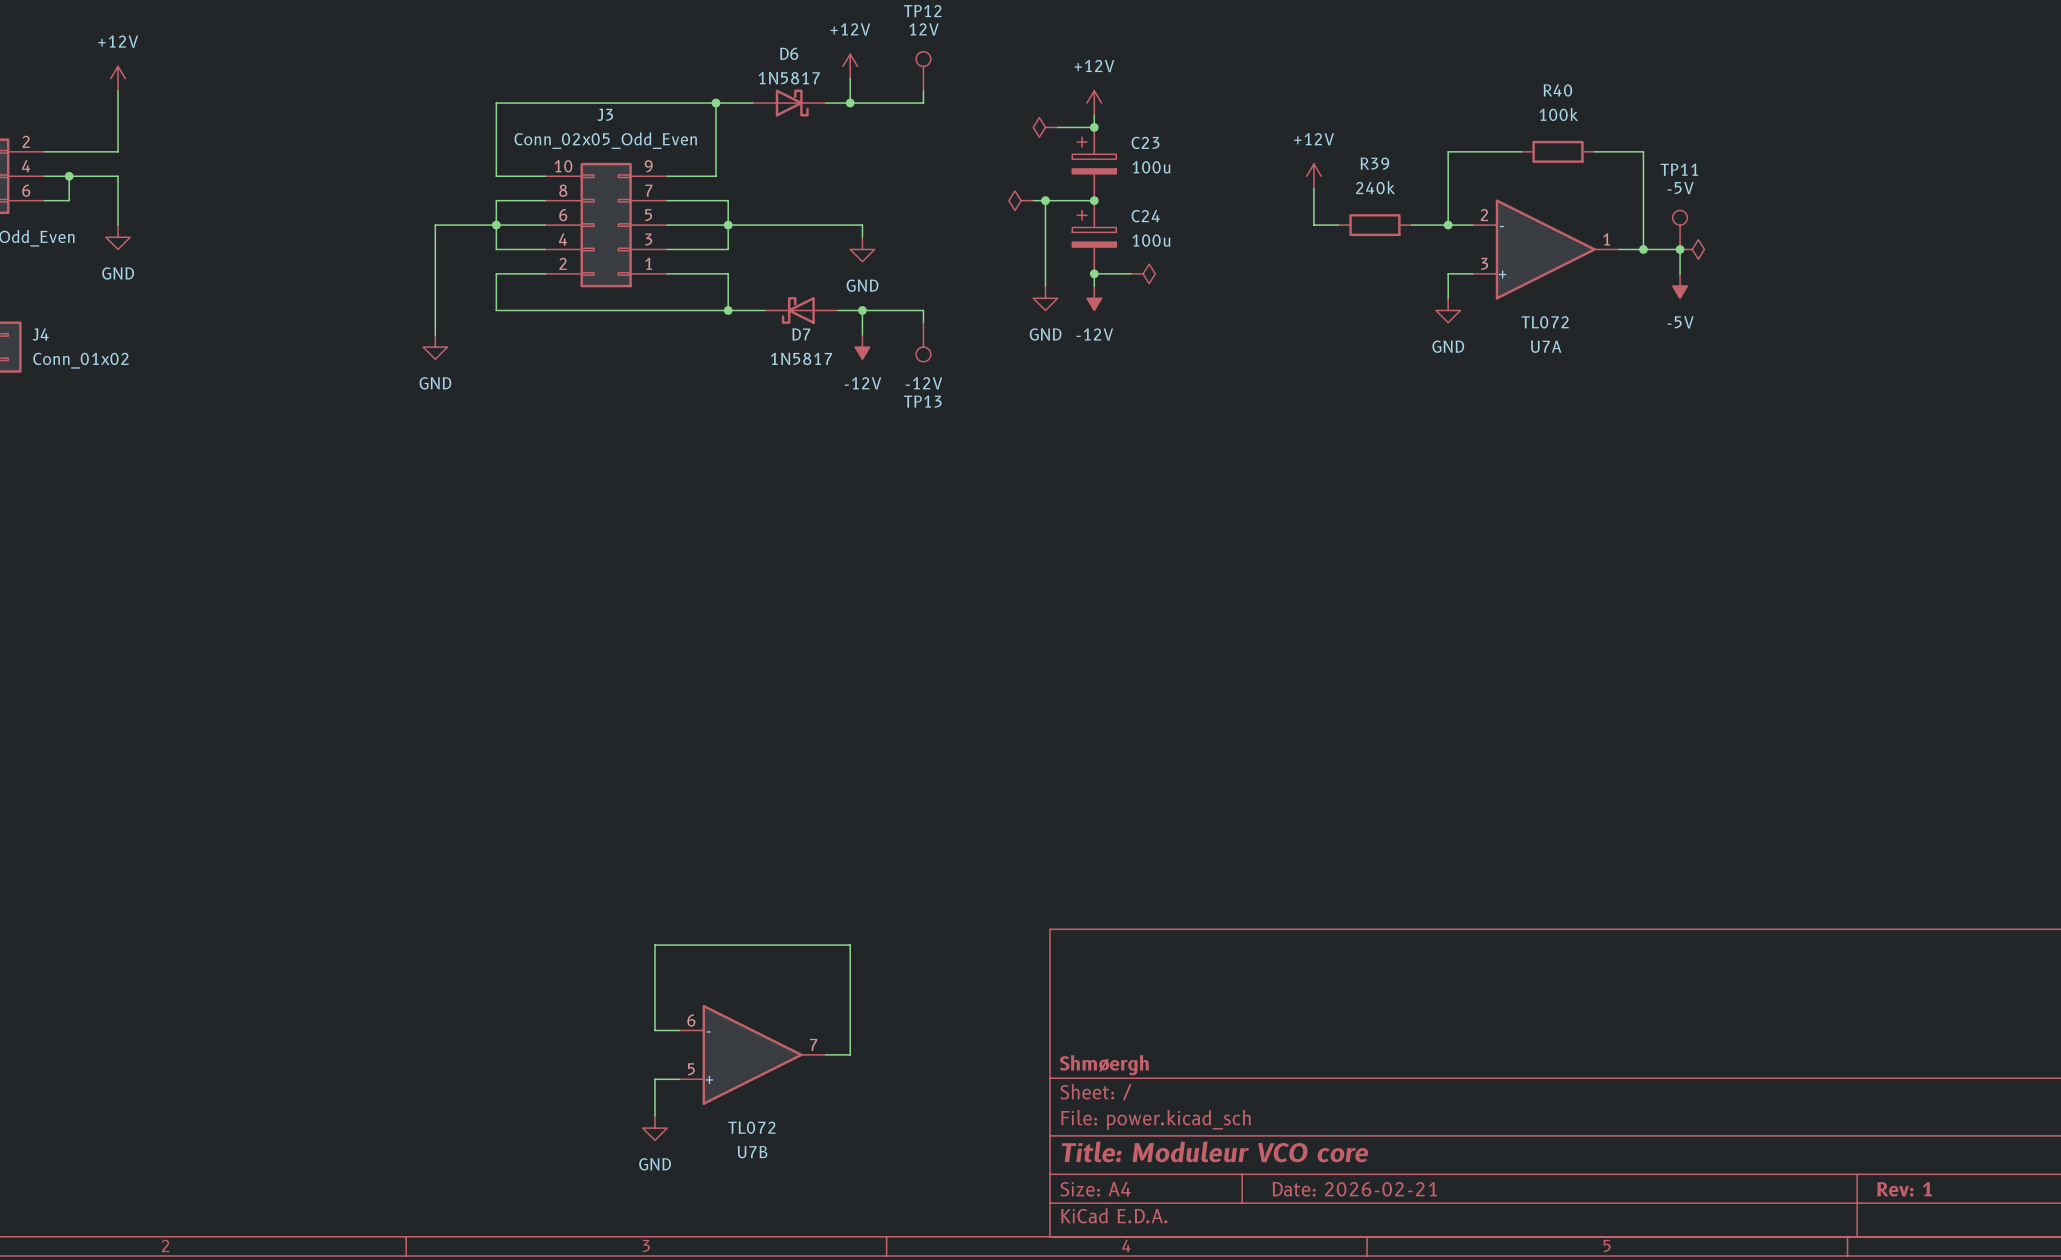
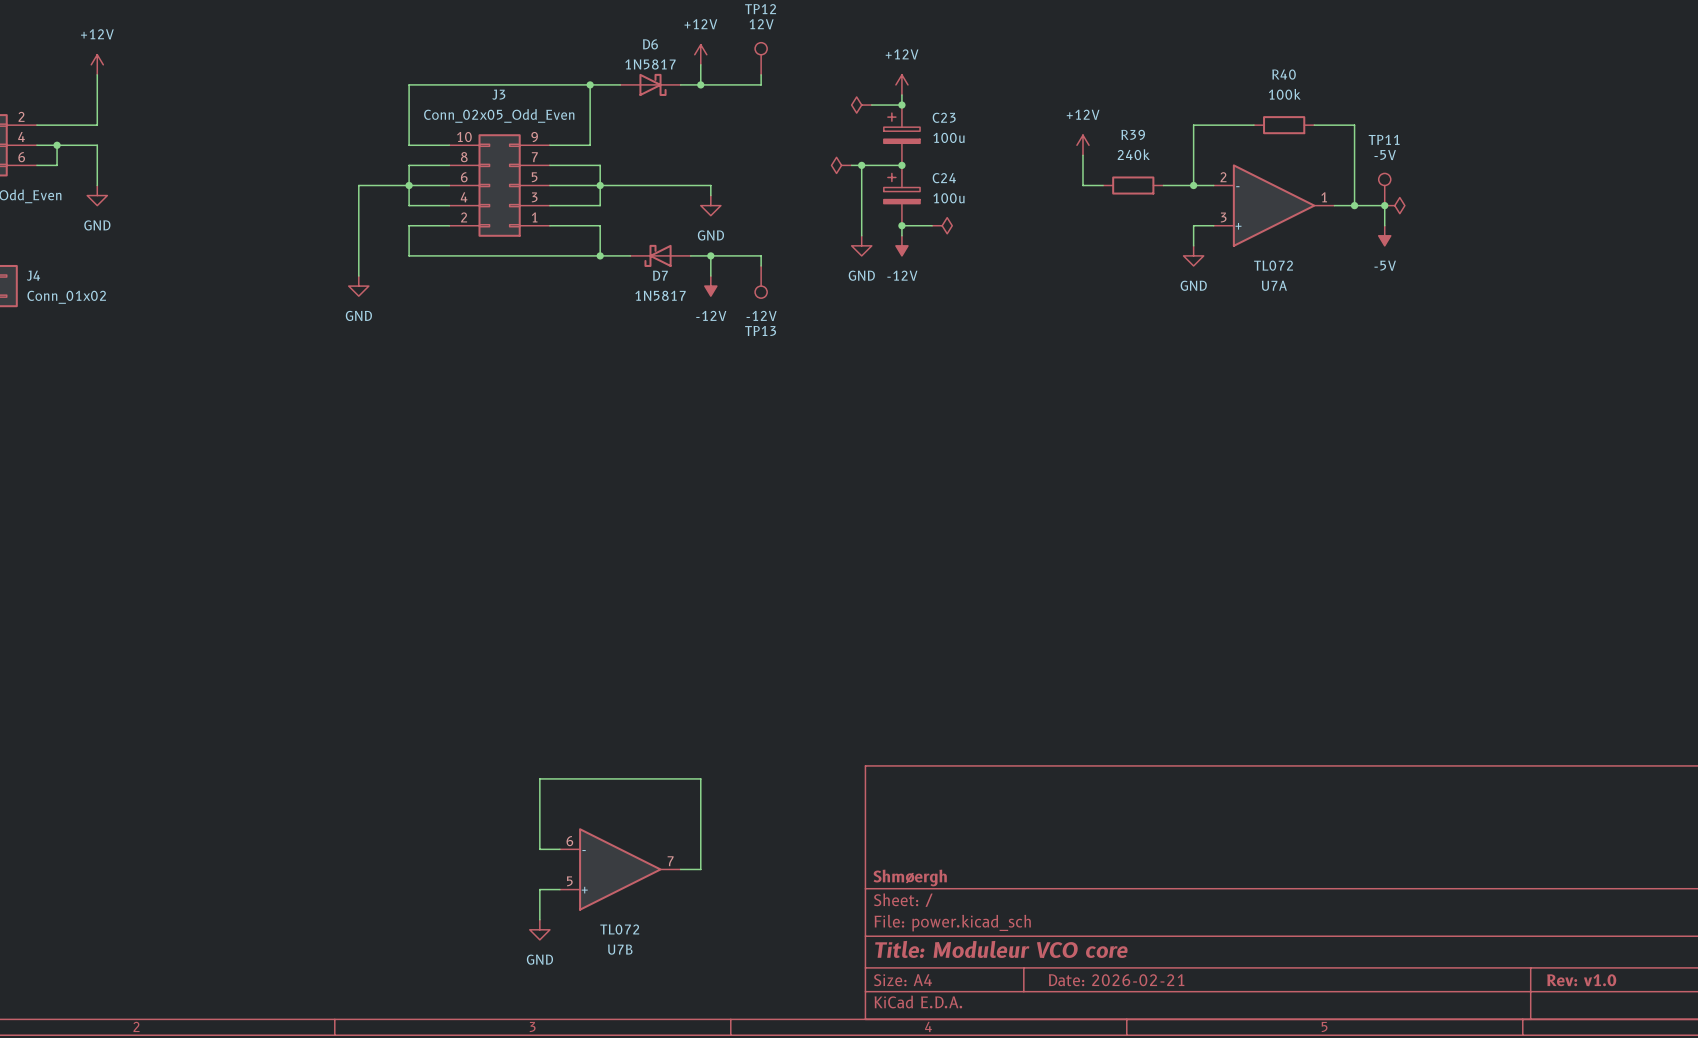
title block: Rev: 1 (1904, 1189) -> Rev: v1.0 (1581, 980)

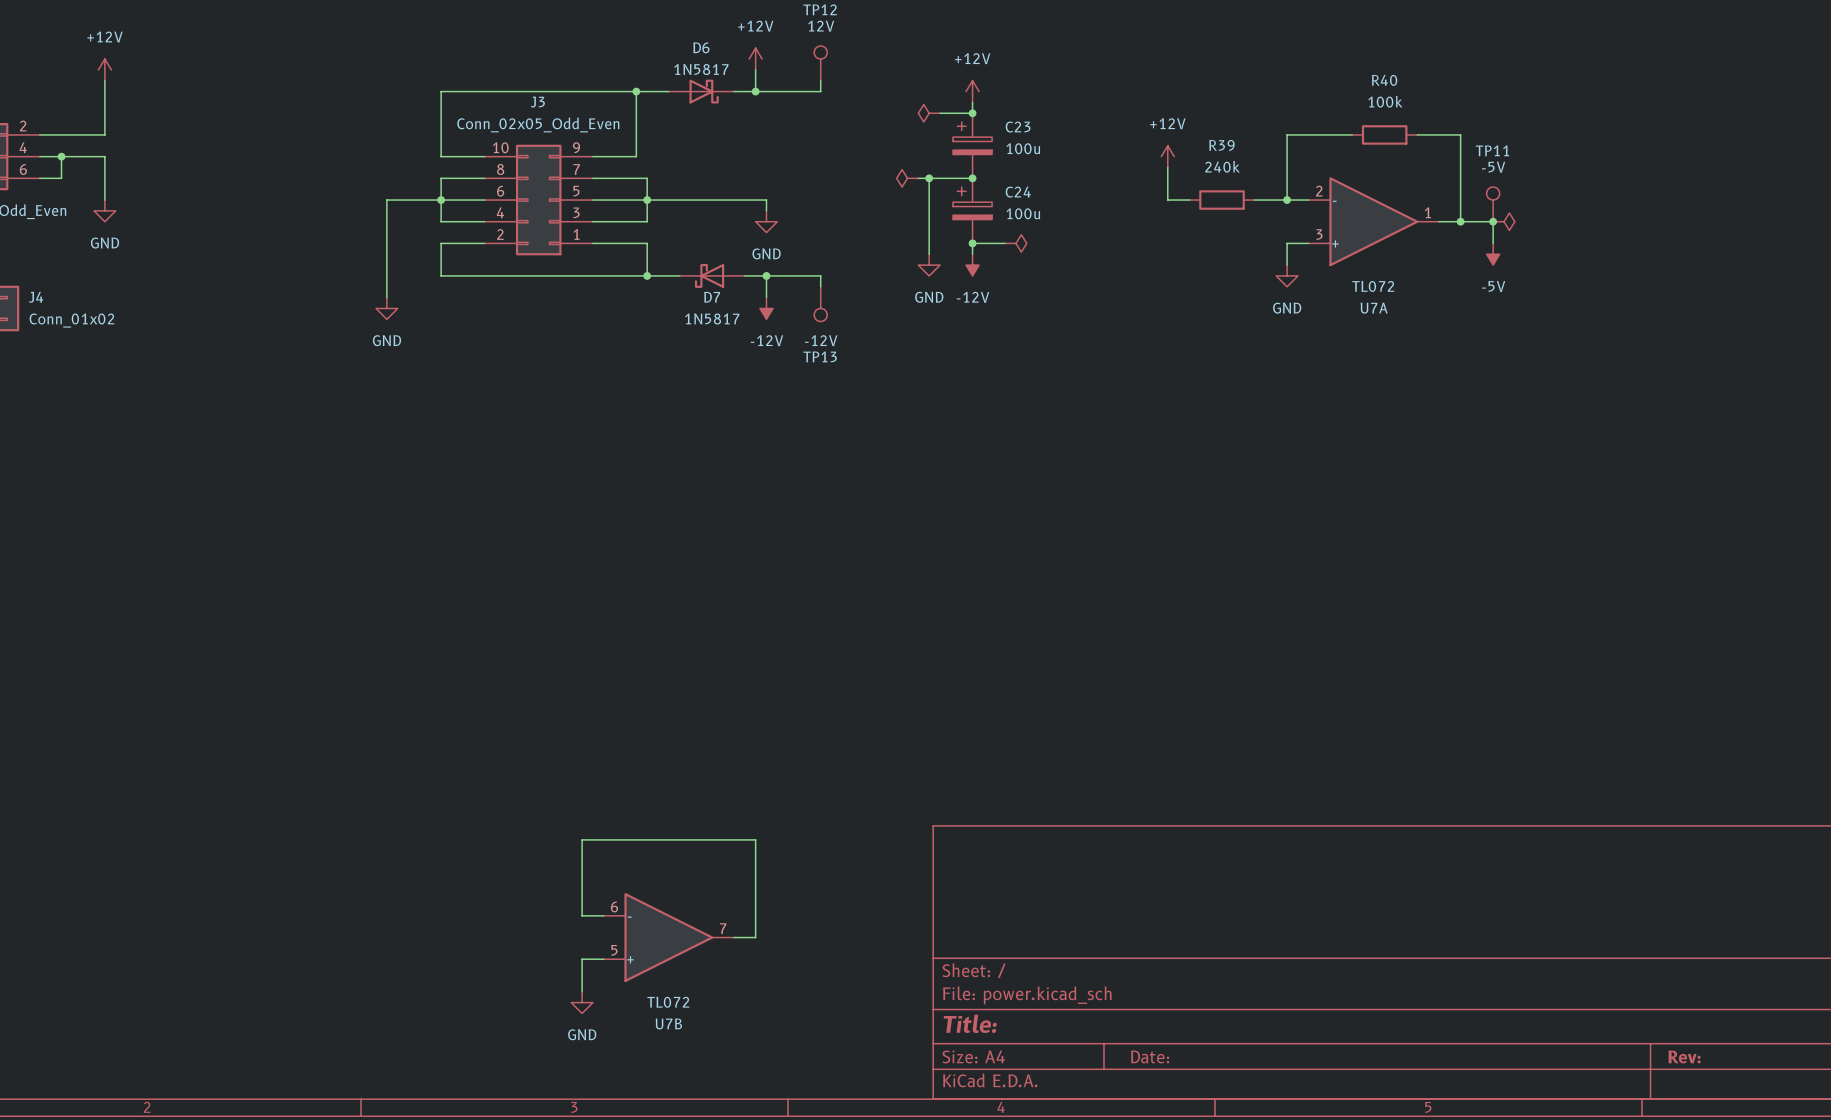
title block: Shmøergh (910, 877) -> none
title block: Title: Moduleur VCO core (1001, 949) -> Title: (970, 1023)
title block: Date: 2026-02-21 (1116, 980) -> Date: (1150, 1056)
title block: Rev: v1.0 (1581, 980) -> Rev: (1684, 1057)

